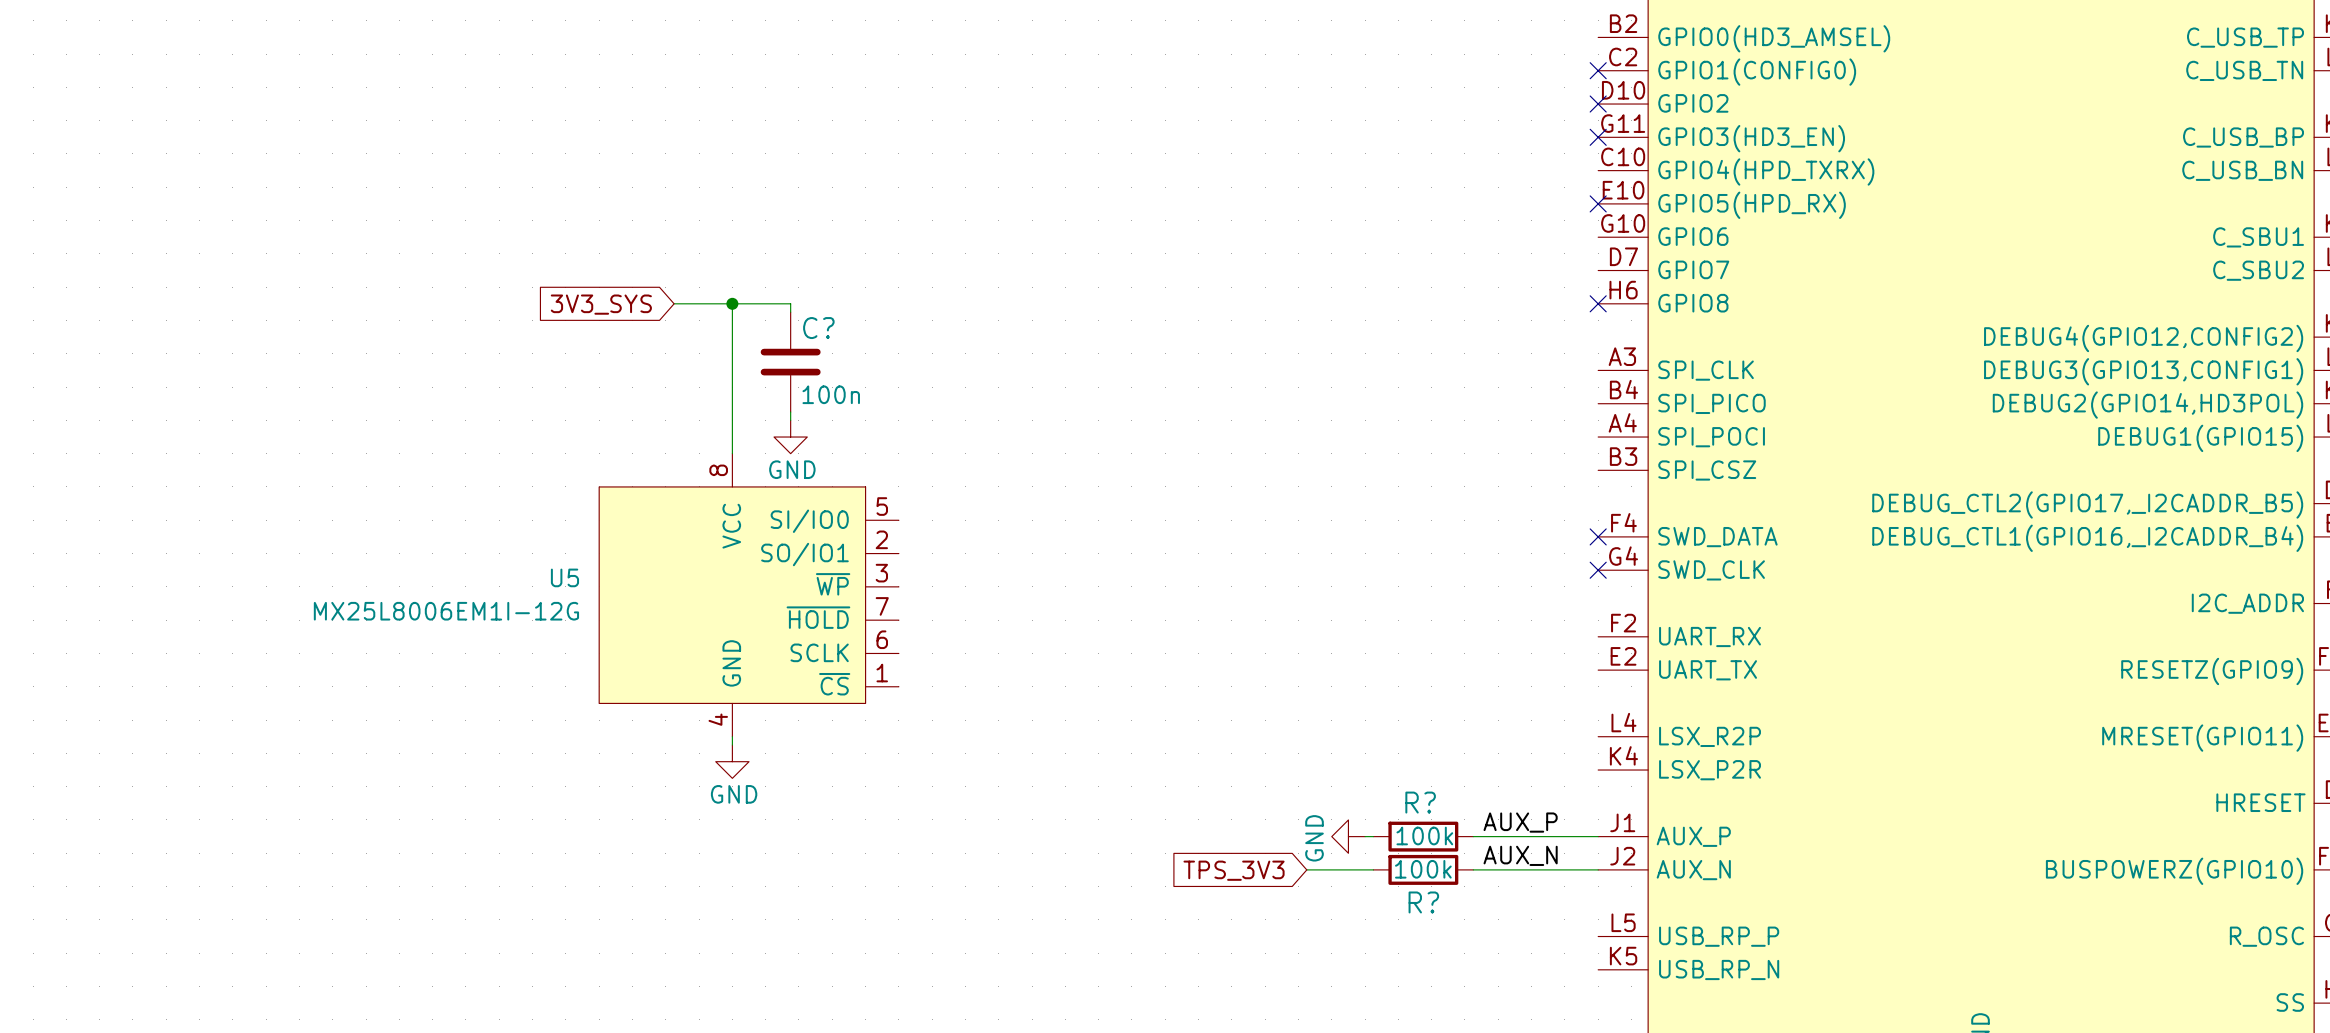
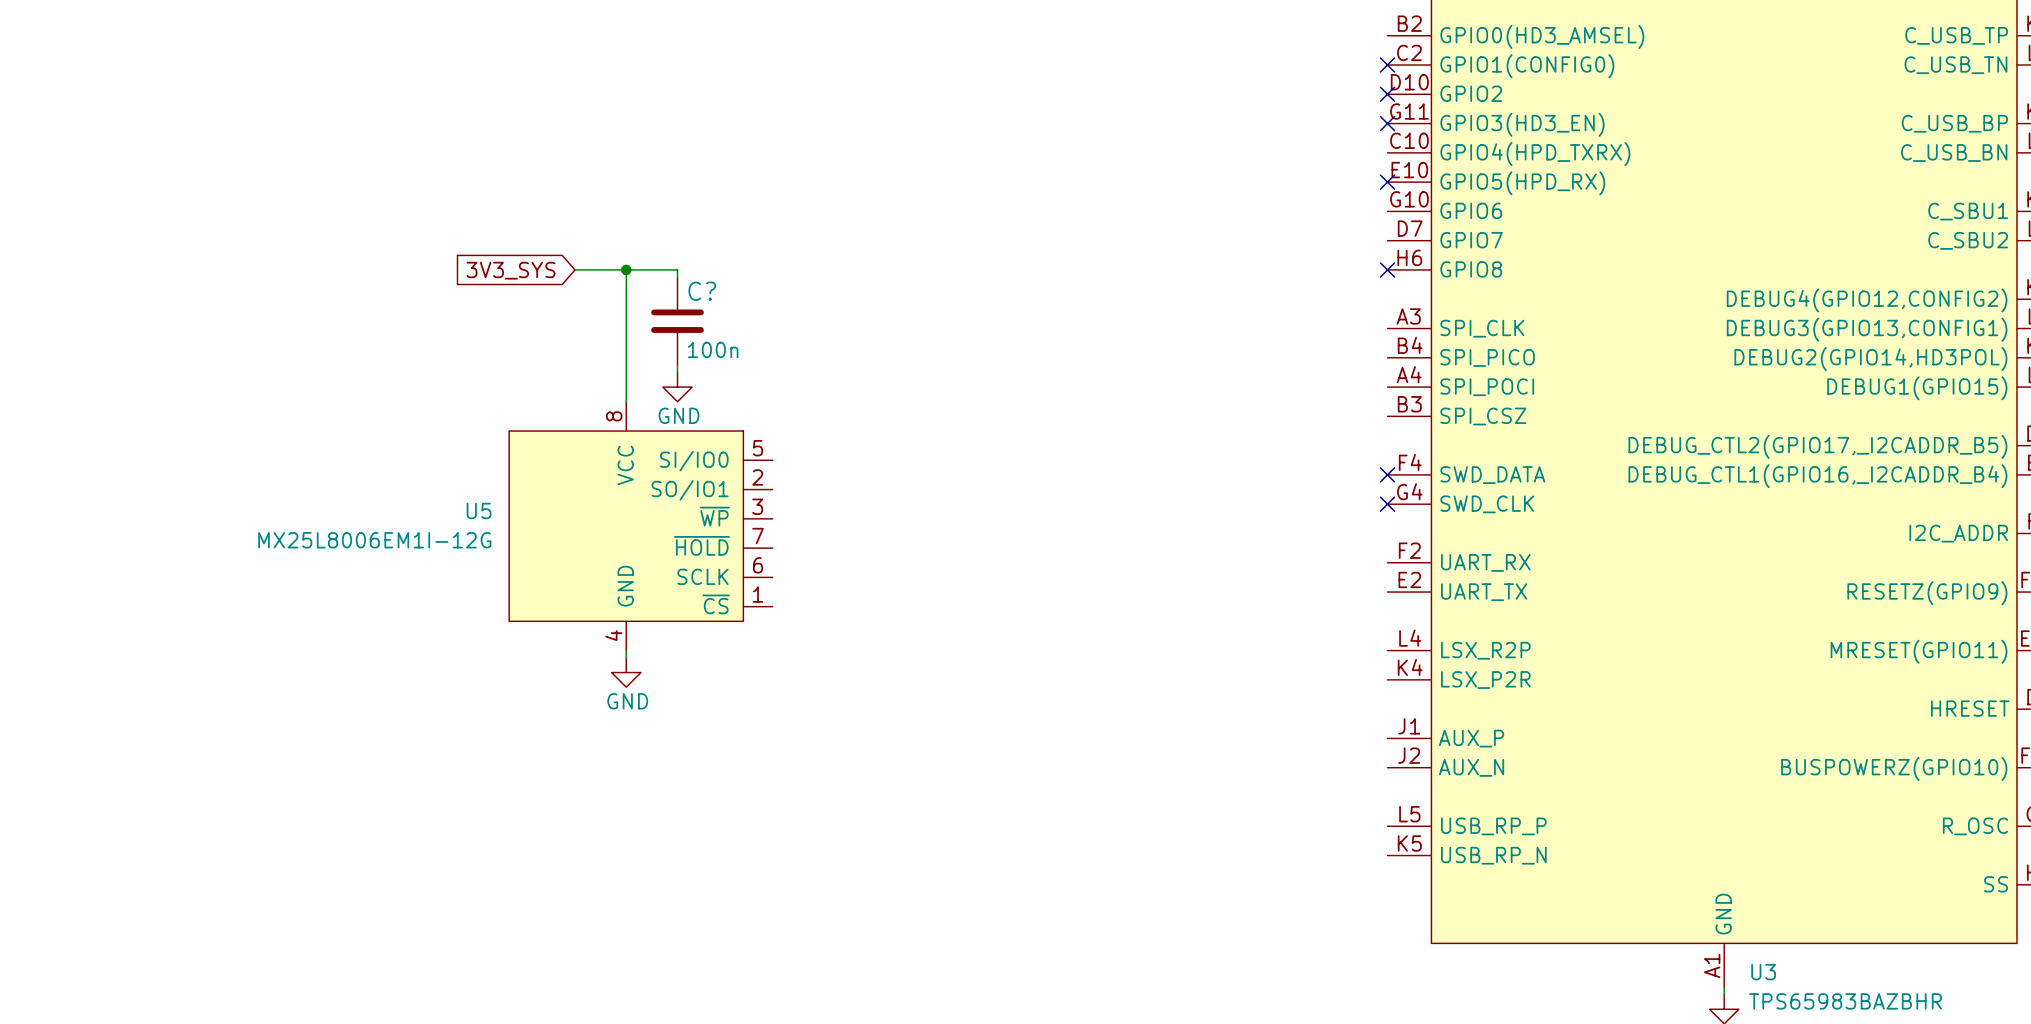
label: AUX_P (1520, 822) -> none
power symbol: GND (1348, 836) -> none
wire: (1365, 836) (1373, 836) -> none
R?: (1423, 836) -> none
wire: (1473, 836) (1598, 836) -> none
label: AUX_N (1520, 855) -> none
wire: (1306, 869) (1373, 869) -> none
R?: (1423, 869) -> none
wire: (1473, 869) (1598, 869) -> none
global label: TPS_3V3 (1234, 870) -> none

